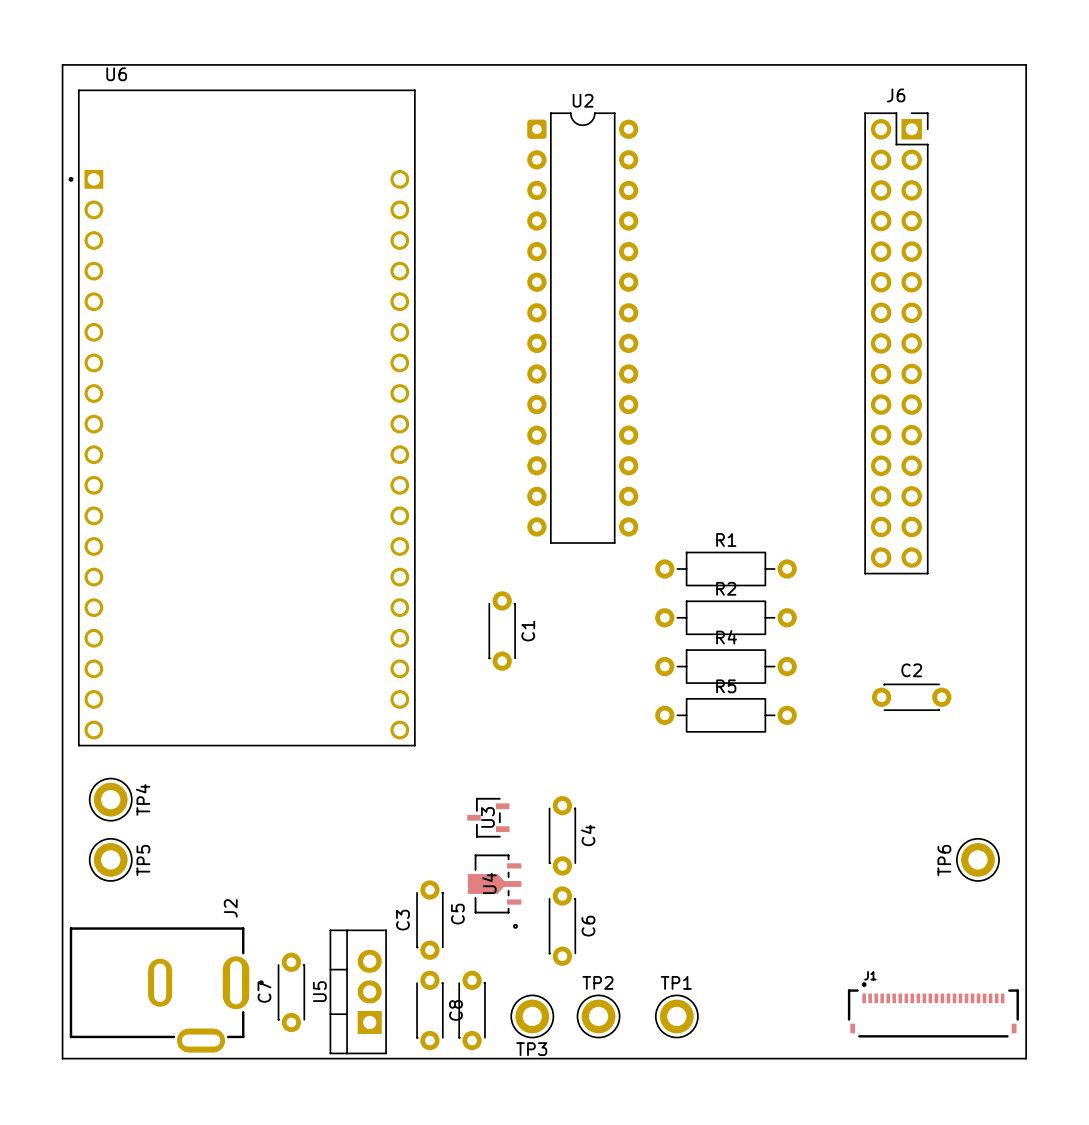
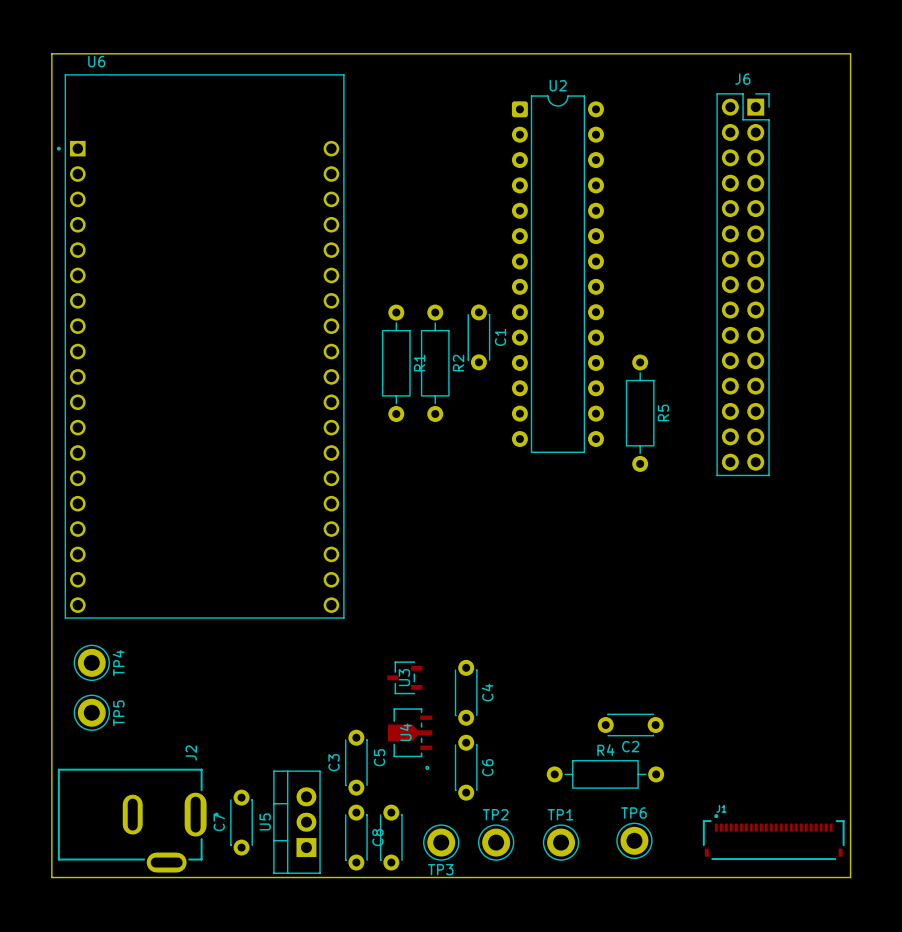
U2 position: (582, 328) -> (557, 274)
R1 rotation: 0° (725, 569) -> 90° clockwise (396, 363)
R1 position: (725, 569) -> (396, 363)
R2 rotation: 0° (725, 617) -> 90° clockwise (435, 363)
R2 position: (725, 617) -> (435, 363)
C1 position: (502, 631) -> (478, 337)
R4 position: (725, 666) -> (605, 774)
C2 name position: C2 (911, 670) -> C2 (630, 746)
C2 position: (911, 697) -> (630, 725)
R5 rotation: 0° (725, 715) -> 90° clockwise (640, 413)
R5 position: (725, 715) -> (640, 413)
TP6 position: (977, 859) -> (634, 840)
TP6 name rotation: 0° (944, 860) -> 90° clockwise (633, 812)
TP6 name position: TP6 (944, 860) -> TP6 (633, 812)

